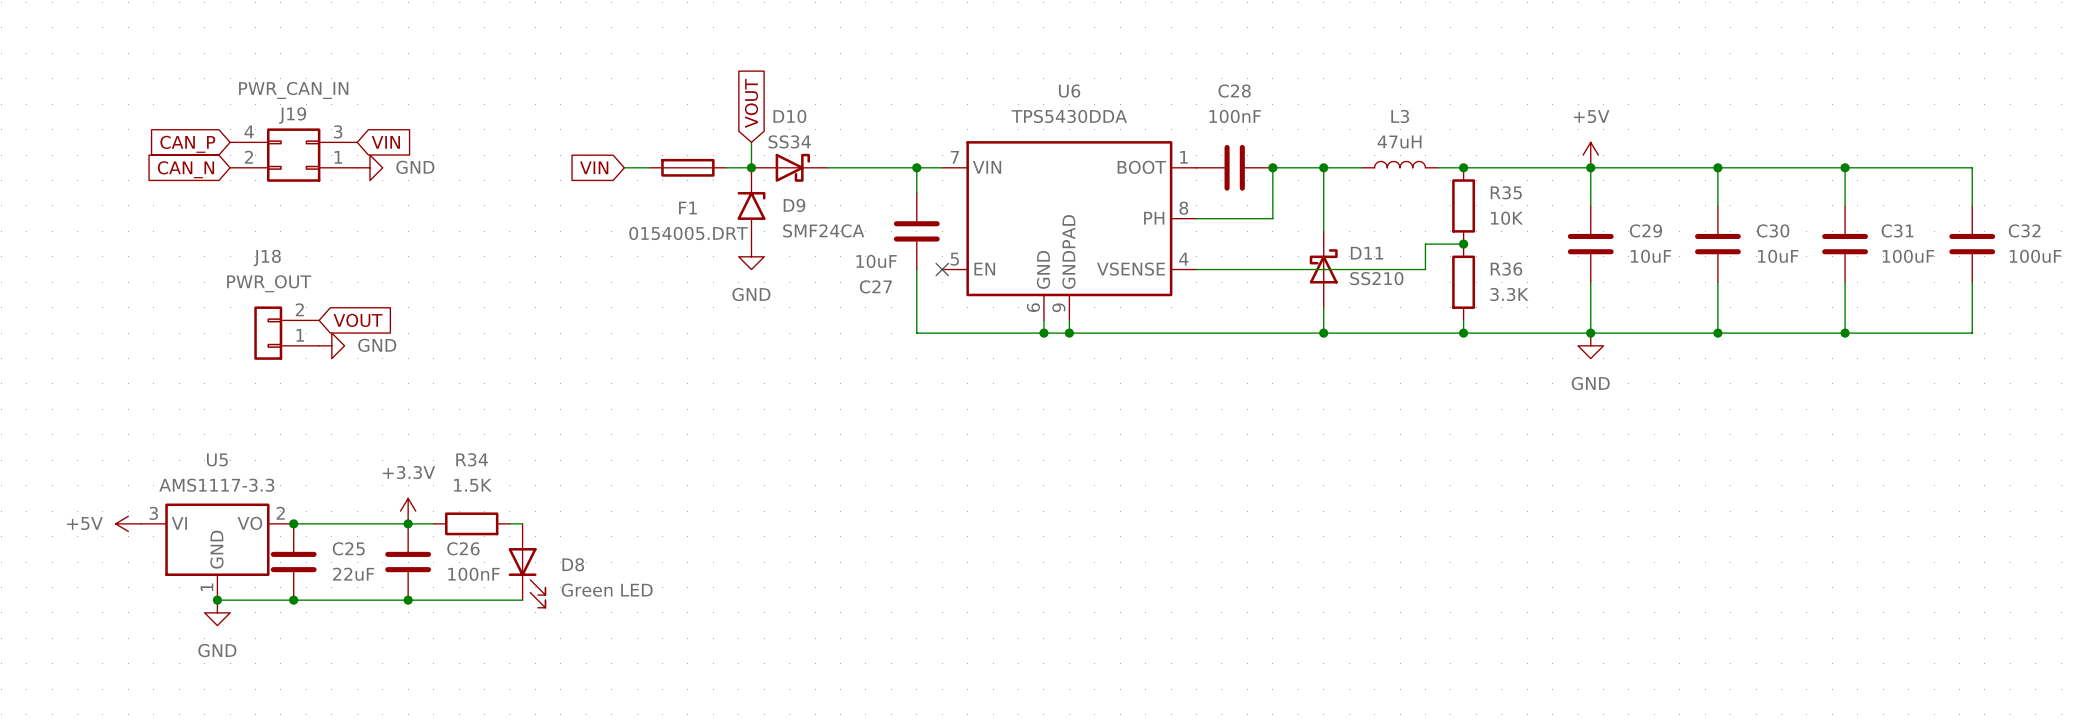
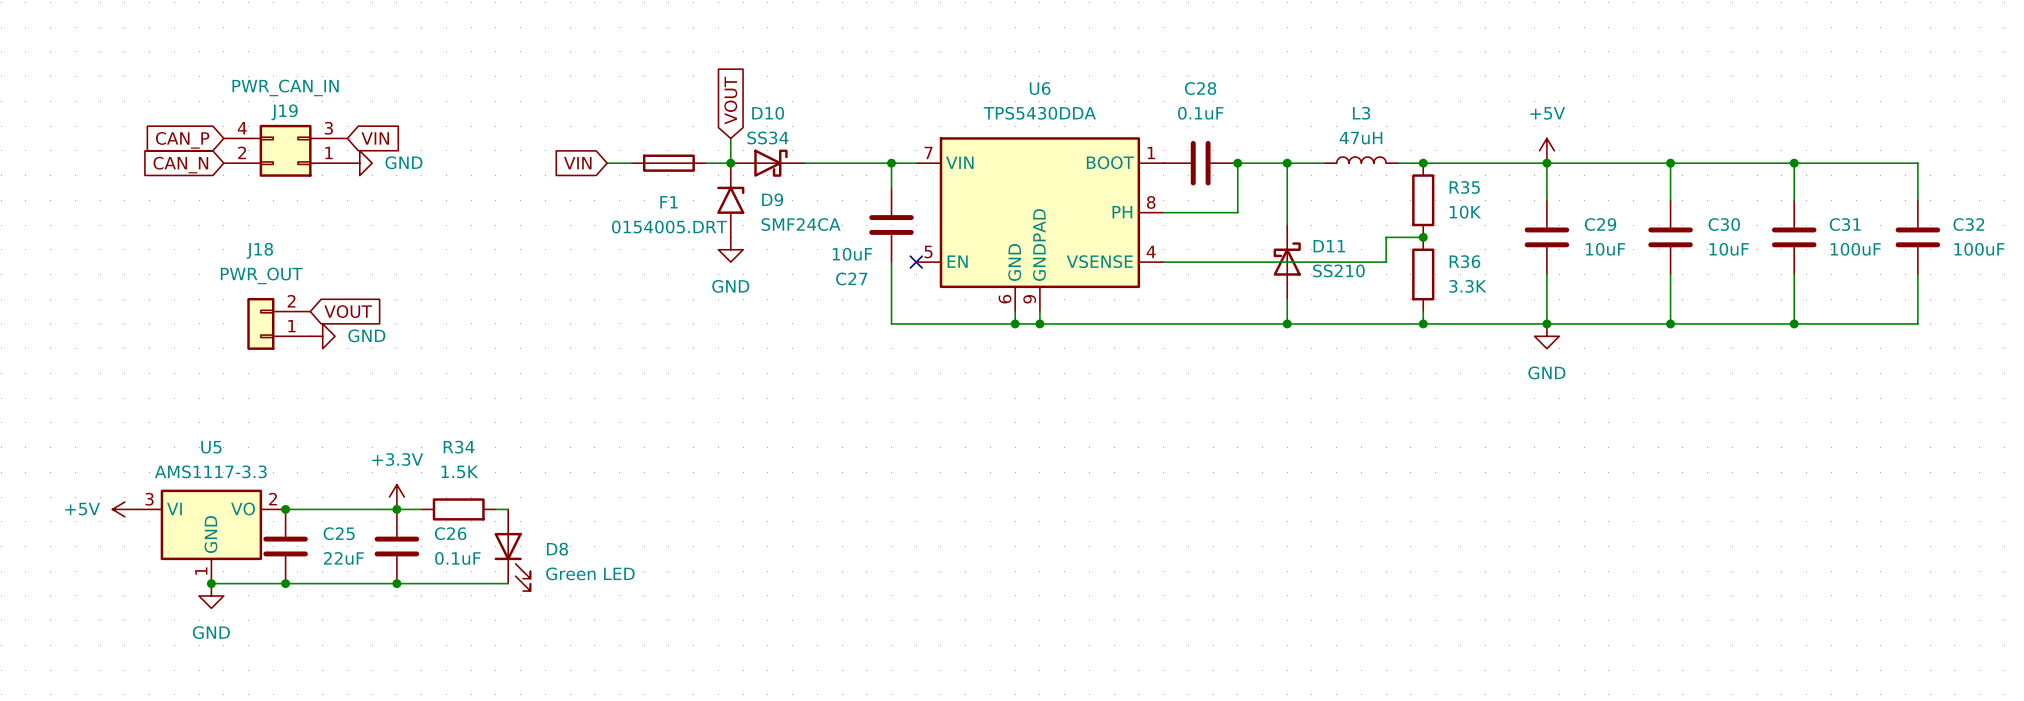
C28 value: 100nF (1235, 116) -> 0.1uF (1200, 113)
C26 value: 100nF (473, 574) -> 0.1uF (457, 558)

